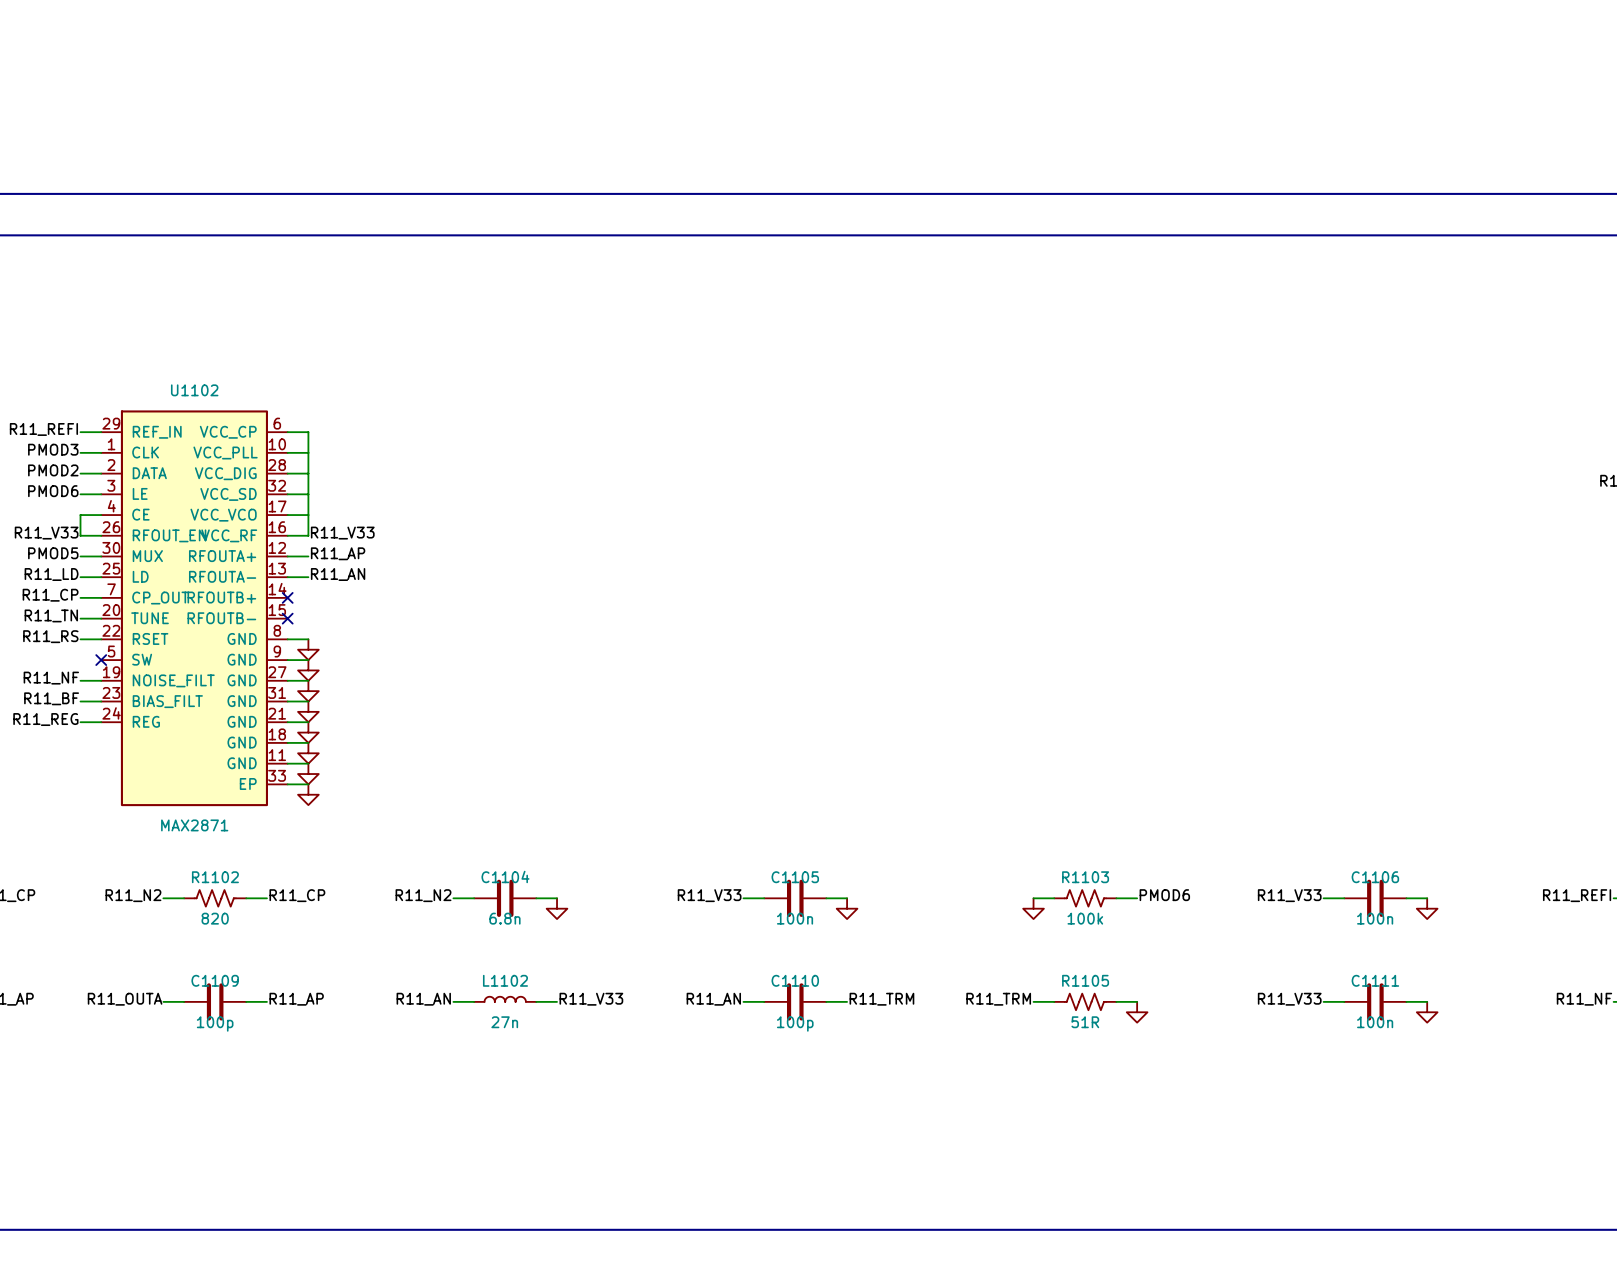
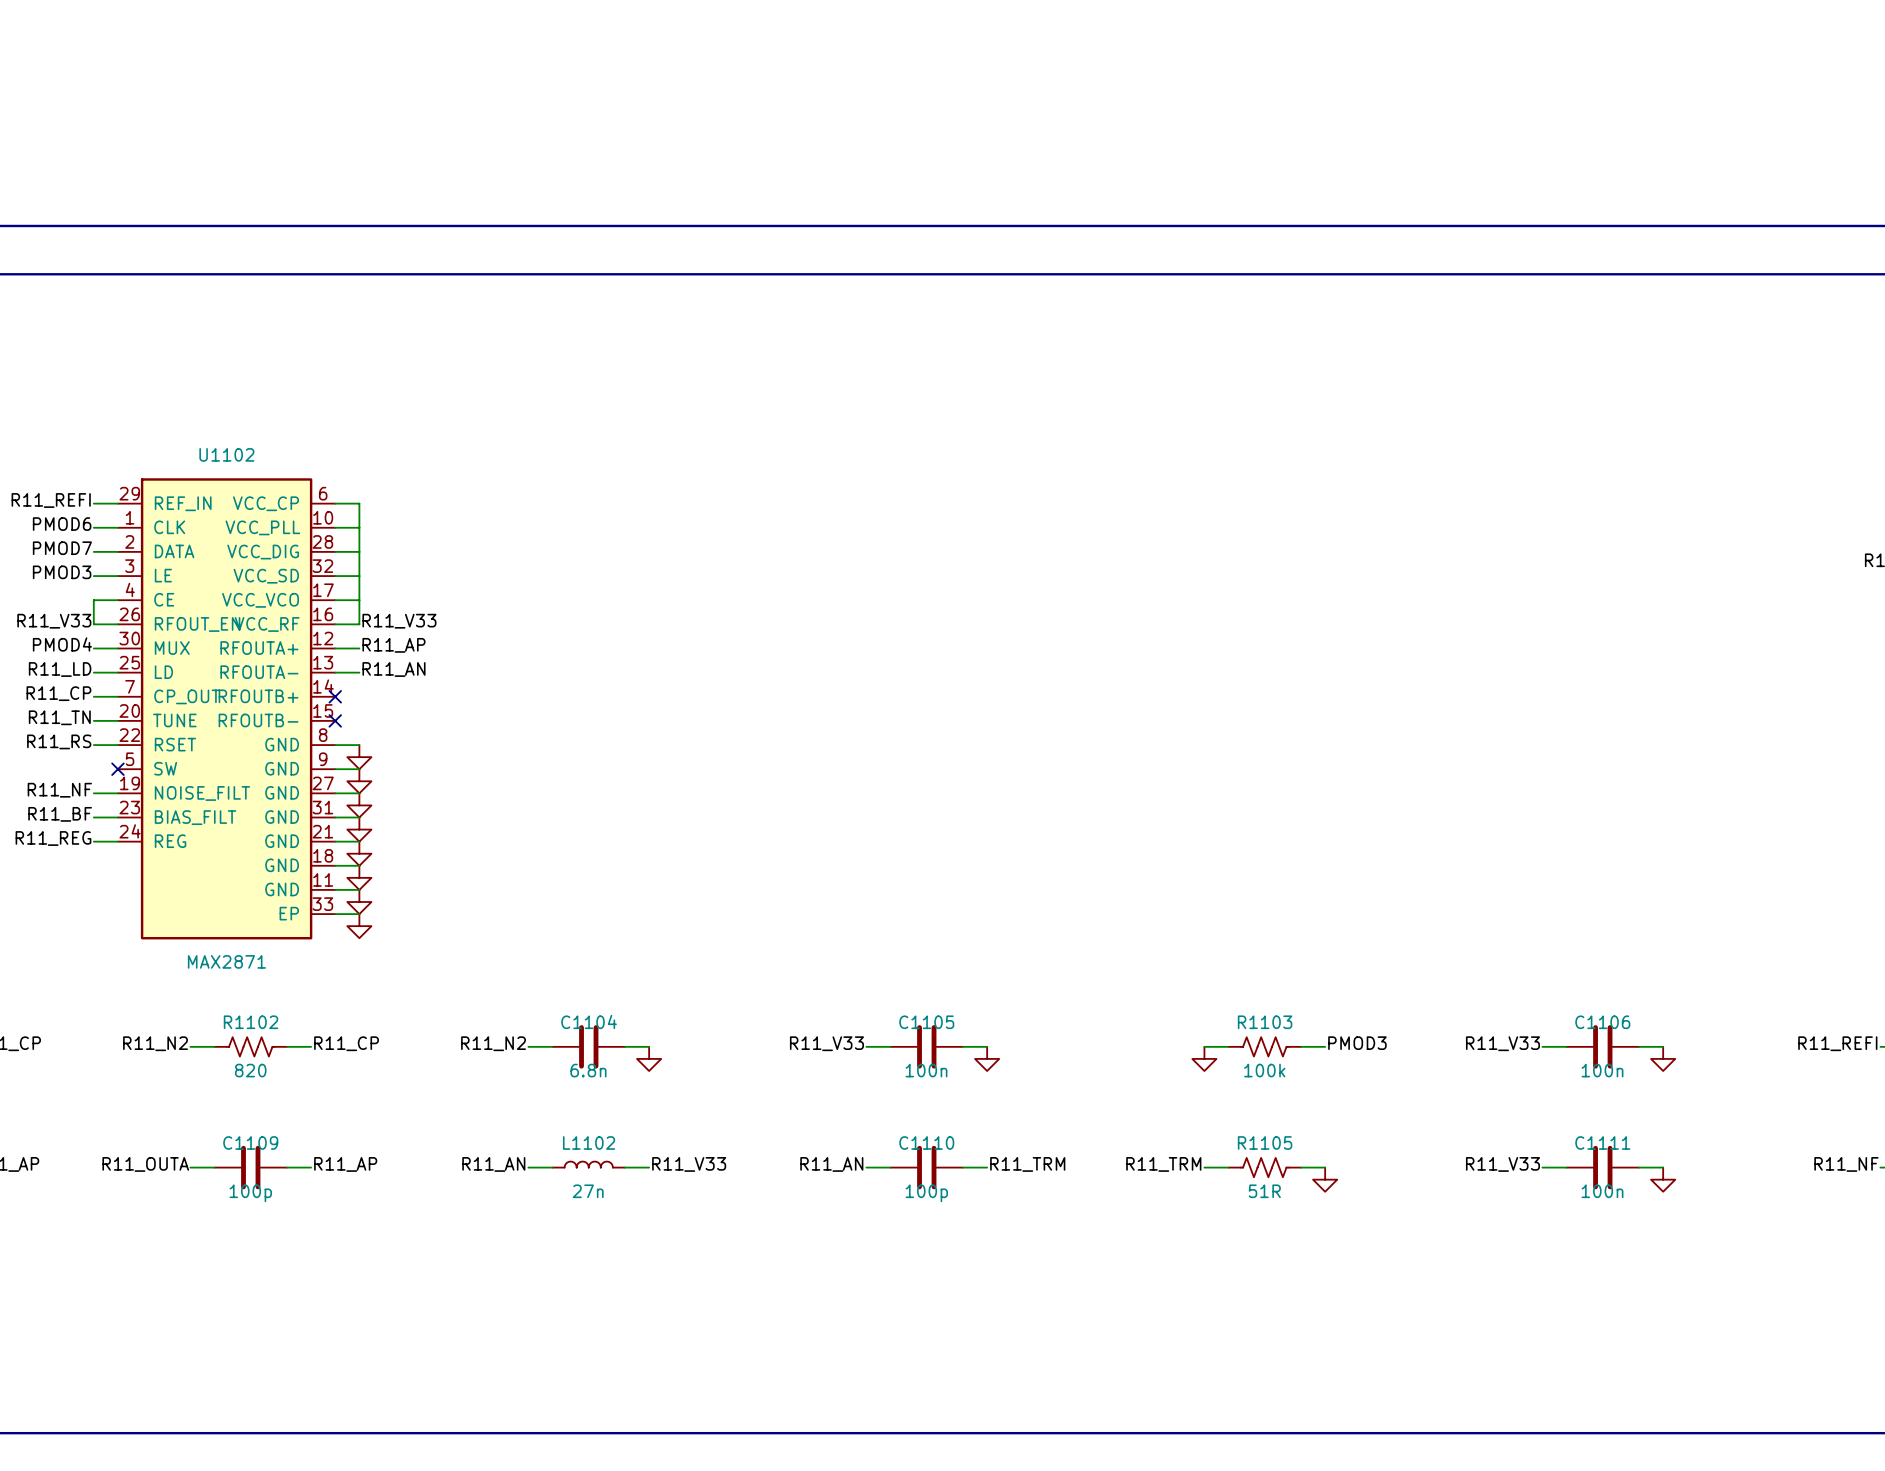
label: PMOD3 (53, 449) -> PMOD6 (62, 524)
label: PMOD2 (53, 470) -> PMOD7 (62, 548)
label: PMOD6 (53, 491) -> PMOD3 (62, 572)
label: PMOD5 (53, 553) -> PMOD4 (62, 644)
label: PMOD6 (1164, 895) -> PMOD3 (1357, 1043)

